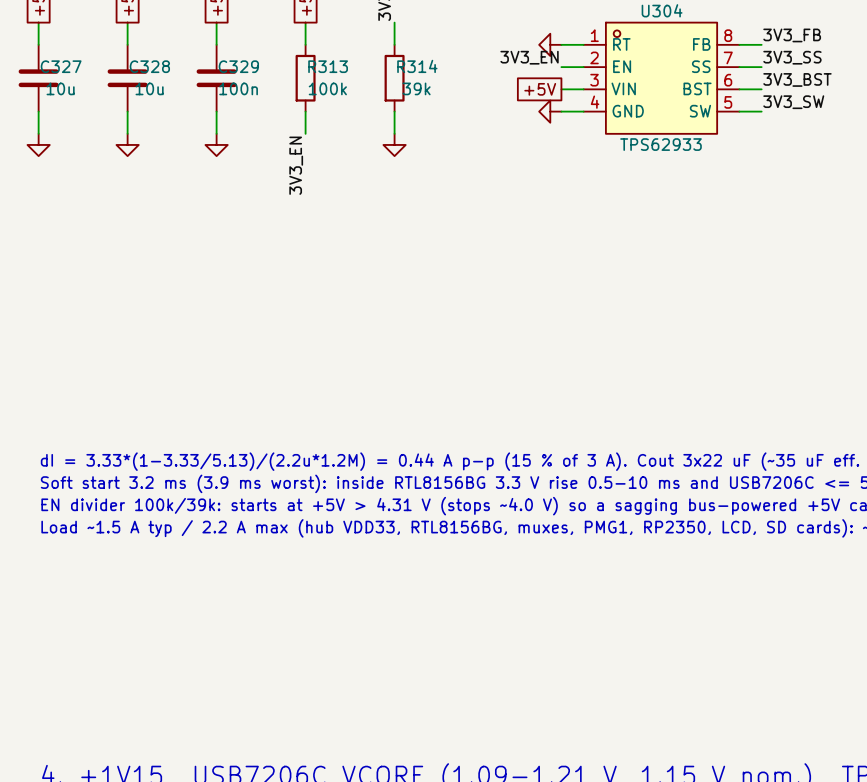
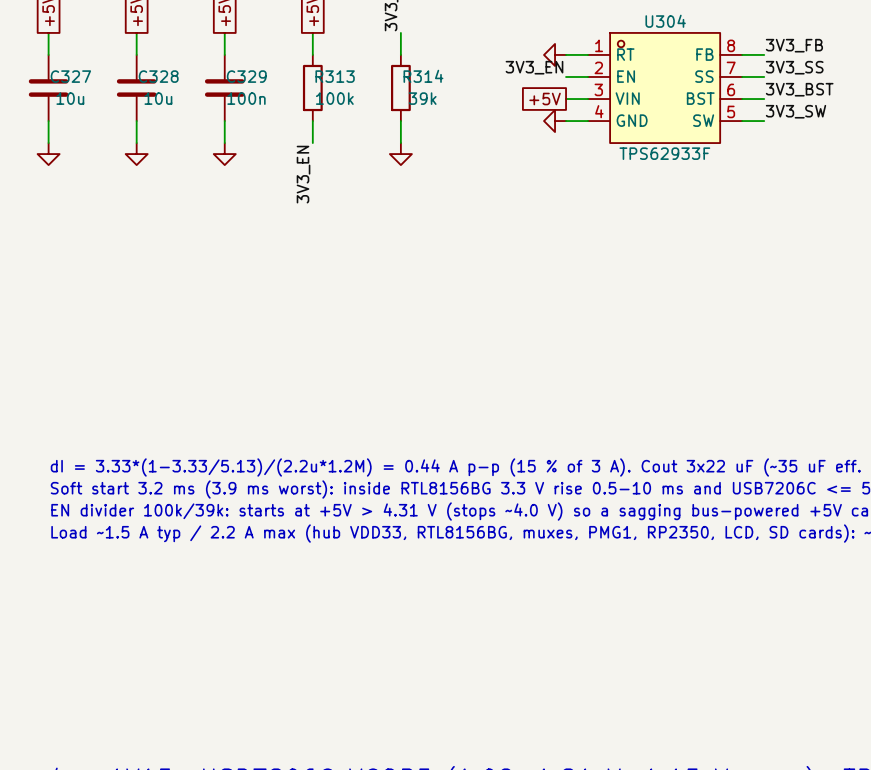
U304 value: TPS62933 (661, 144) -> TPS62933F (664, 153)

